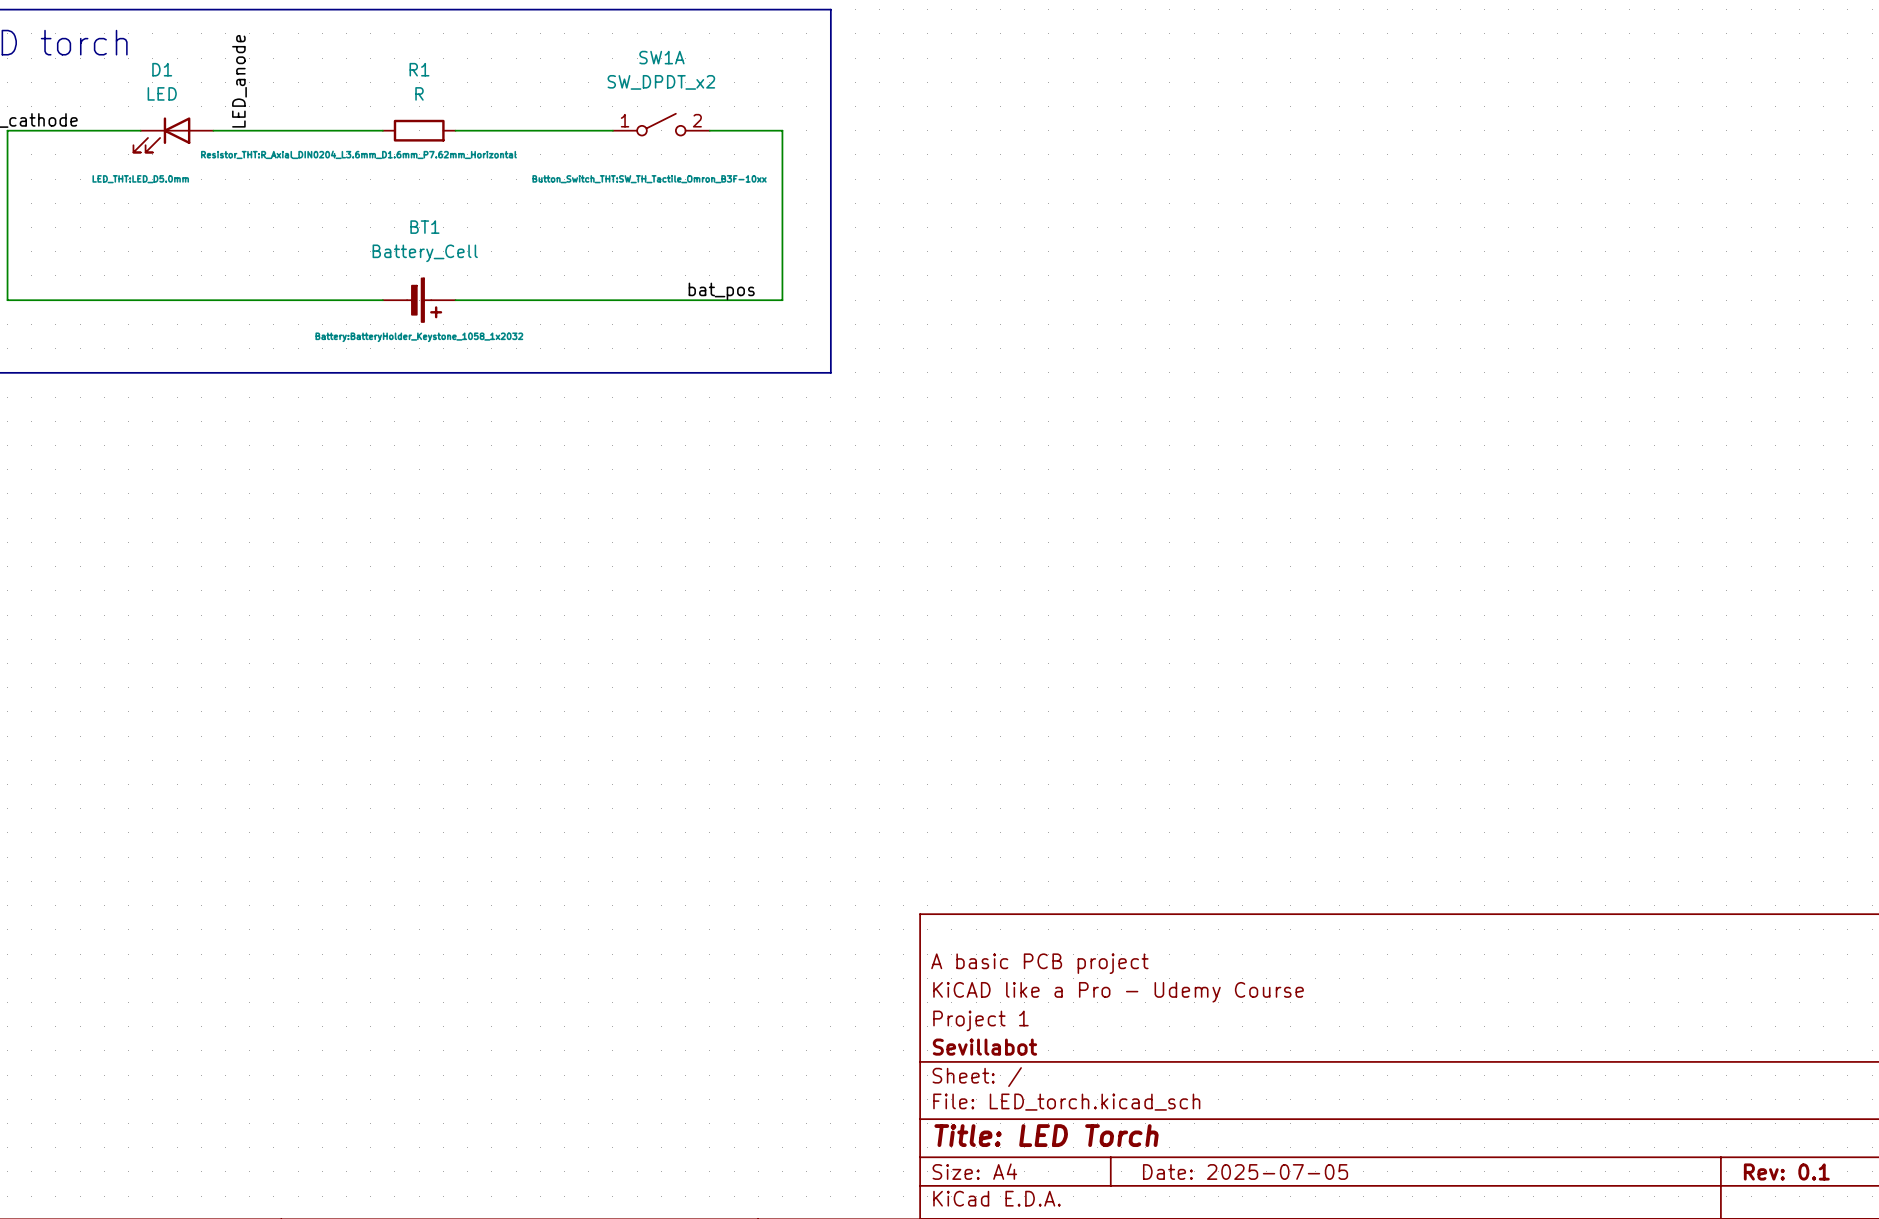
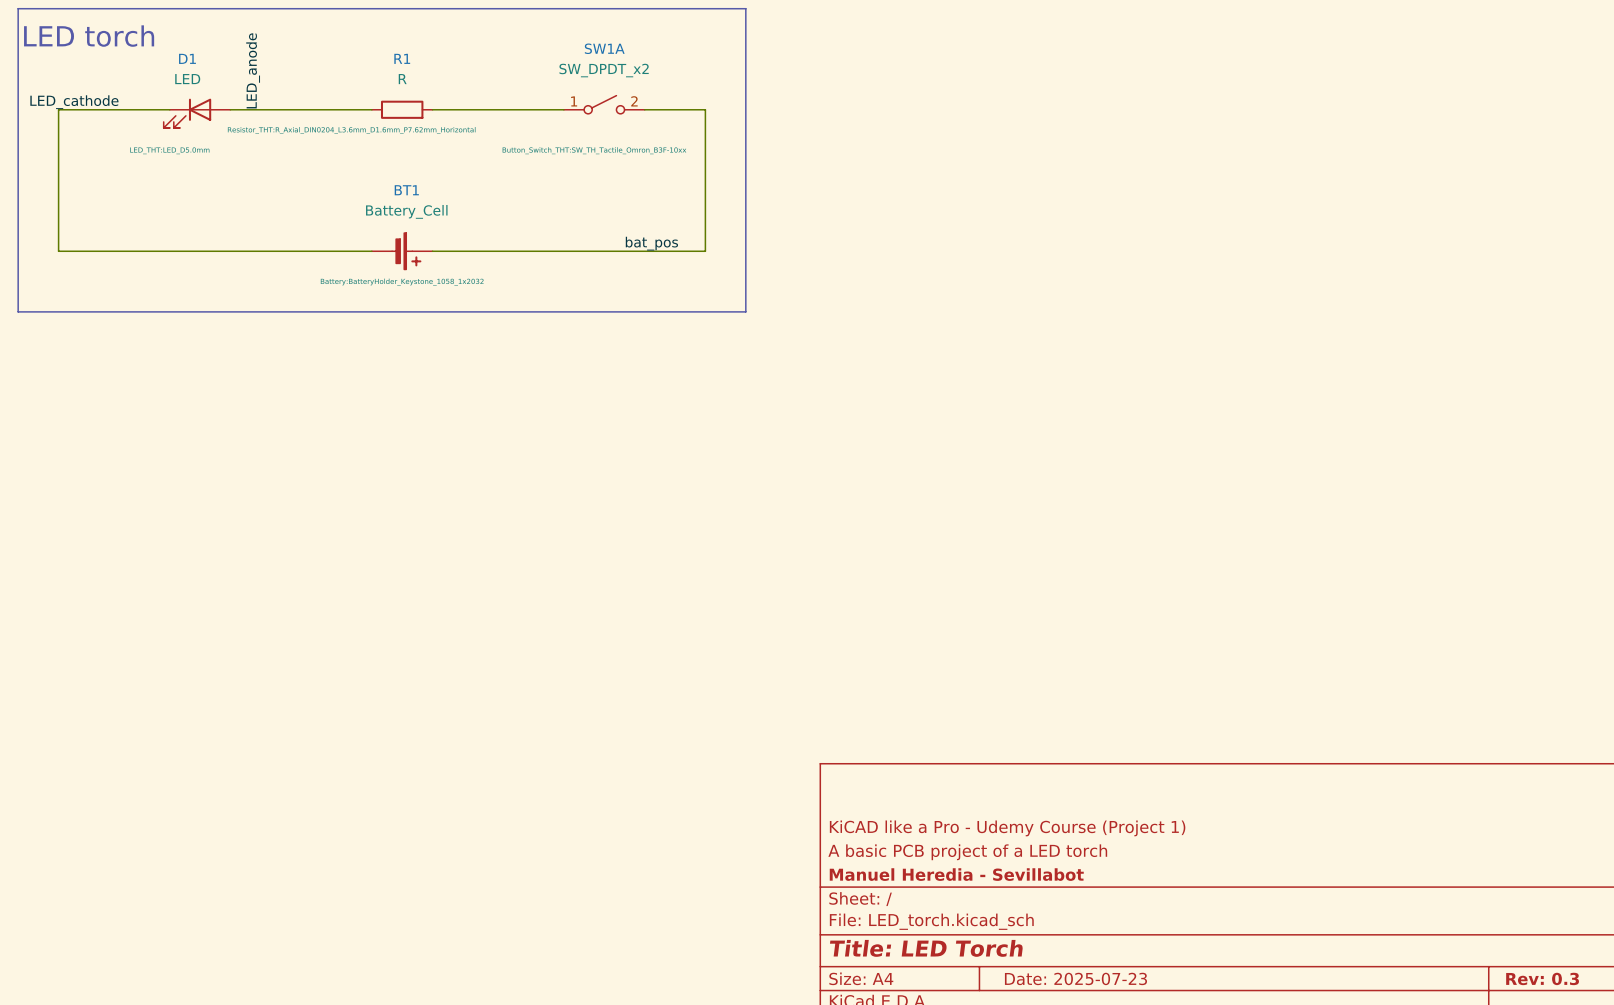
title block: A basic PCB project (1039, 963) -> none
title block: KiCAD like a Pro - Udemy Course (1118, 992) -> KiCAD like a Pro - Udemy Course (Project 1) (1007, 828)
title block: Project 1 (980, 1020) -> A basic PCB project of a LED torch (967, 852)
title block: Sevillabot (984, 1047) -> Manuel Heredia - Sevillabot (956, 874)
title block: Date: 2025-07-05 (1245, 1171) -> Date: 2025-07-23 (1075, 978)
title block: Rev: 0.1 (1786, 1171) -> Rev: 0.3 (1542, 978)

